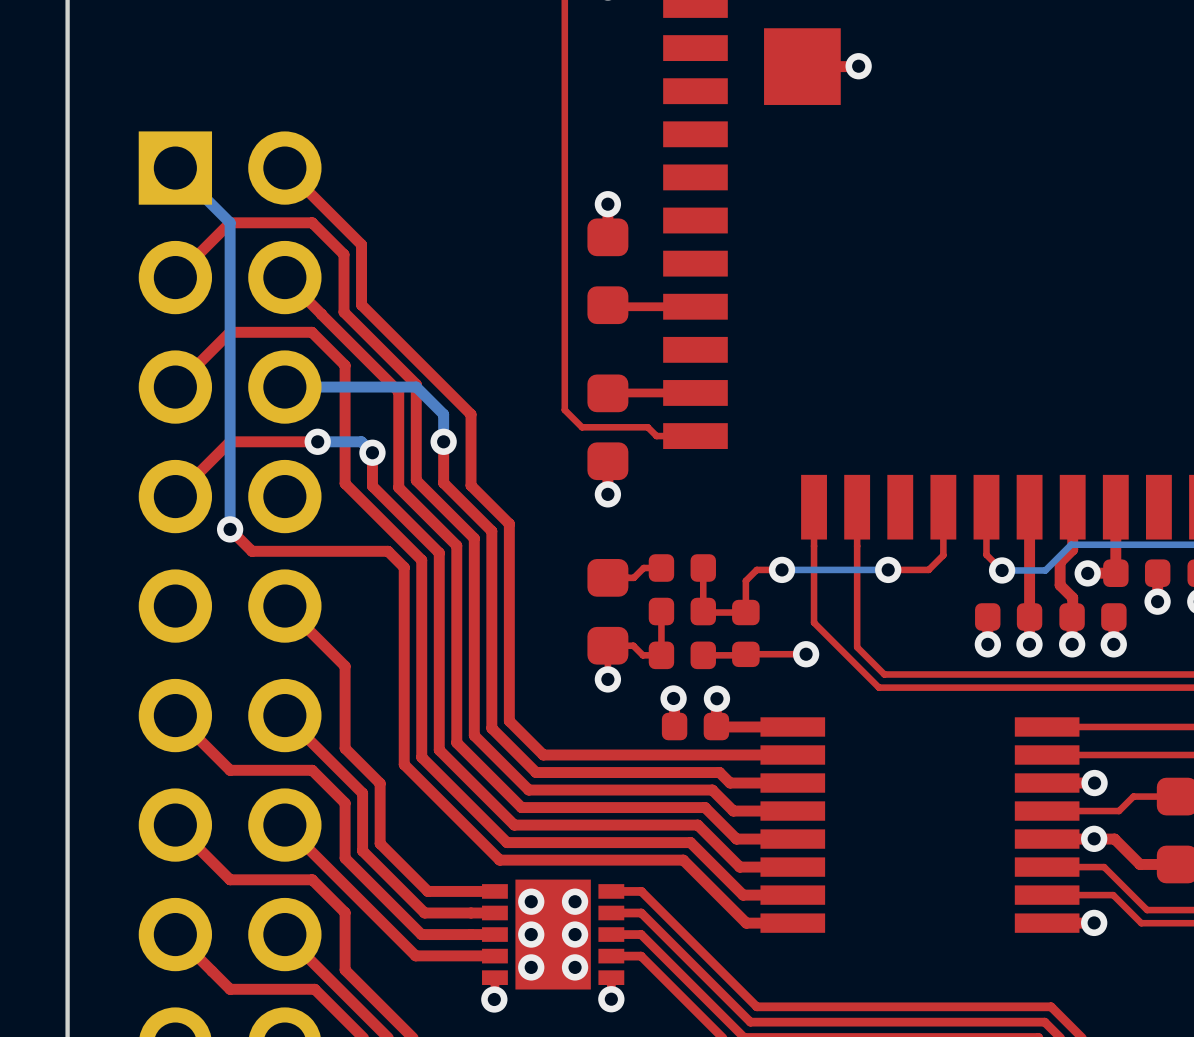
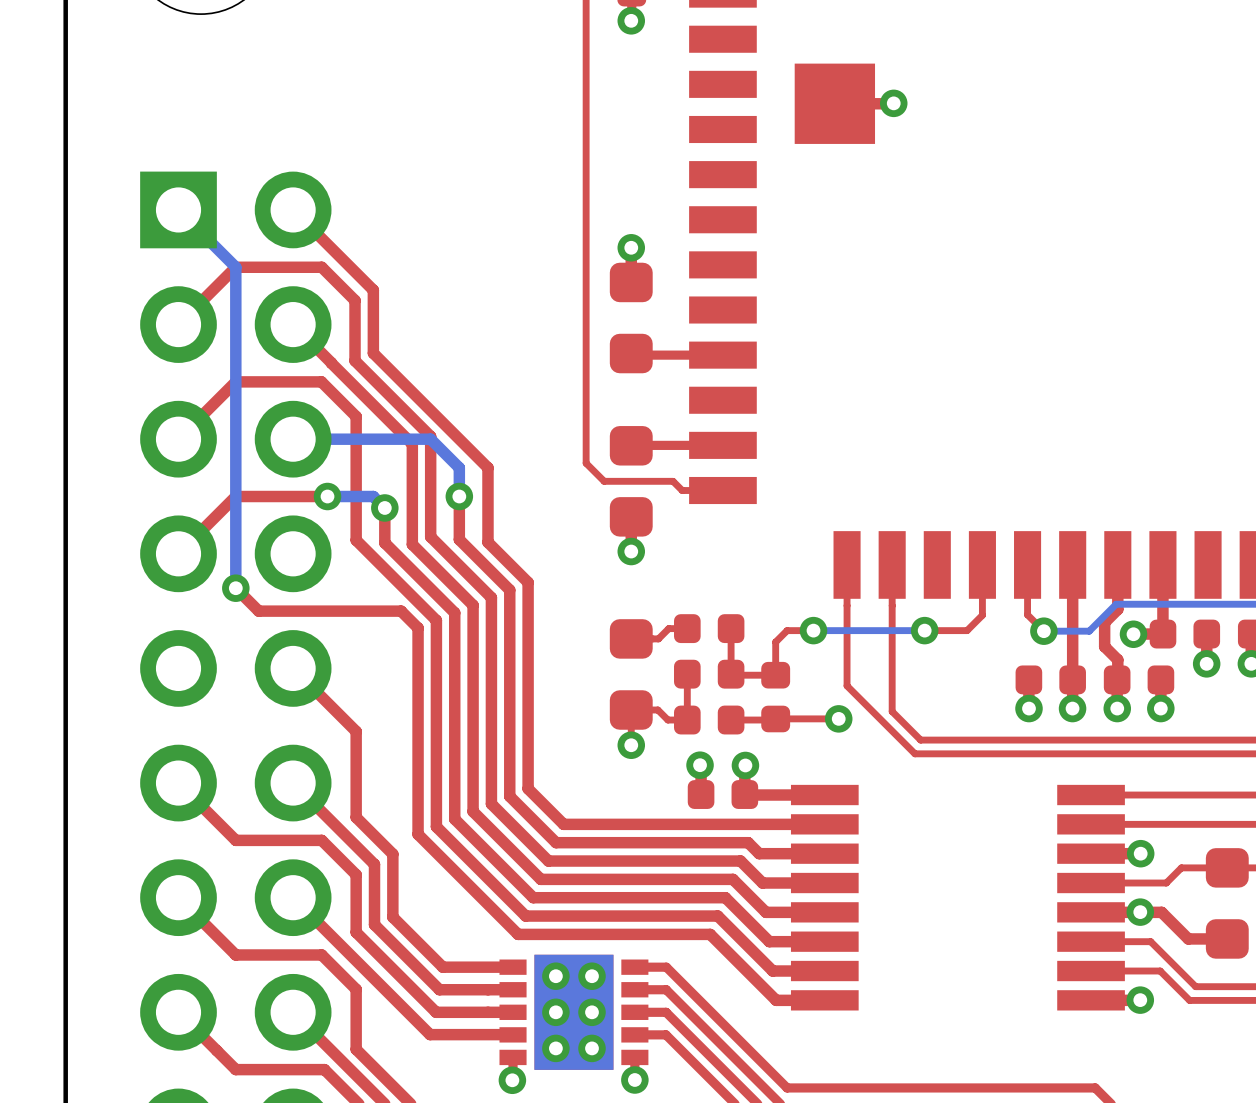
part footprint: [482, 879, 625, 990] -> [499, 954, 649, 1070]
via: (531, 901) -> none
via: (575, 901) -> none
via: (531, 934) -> none
via: (575, 934) -> none
via: (531, 967) -> none
via: (575, 967) -> none

